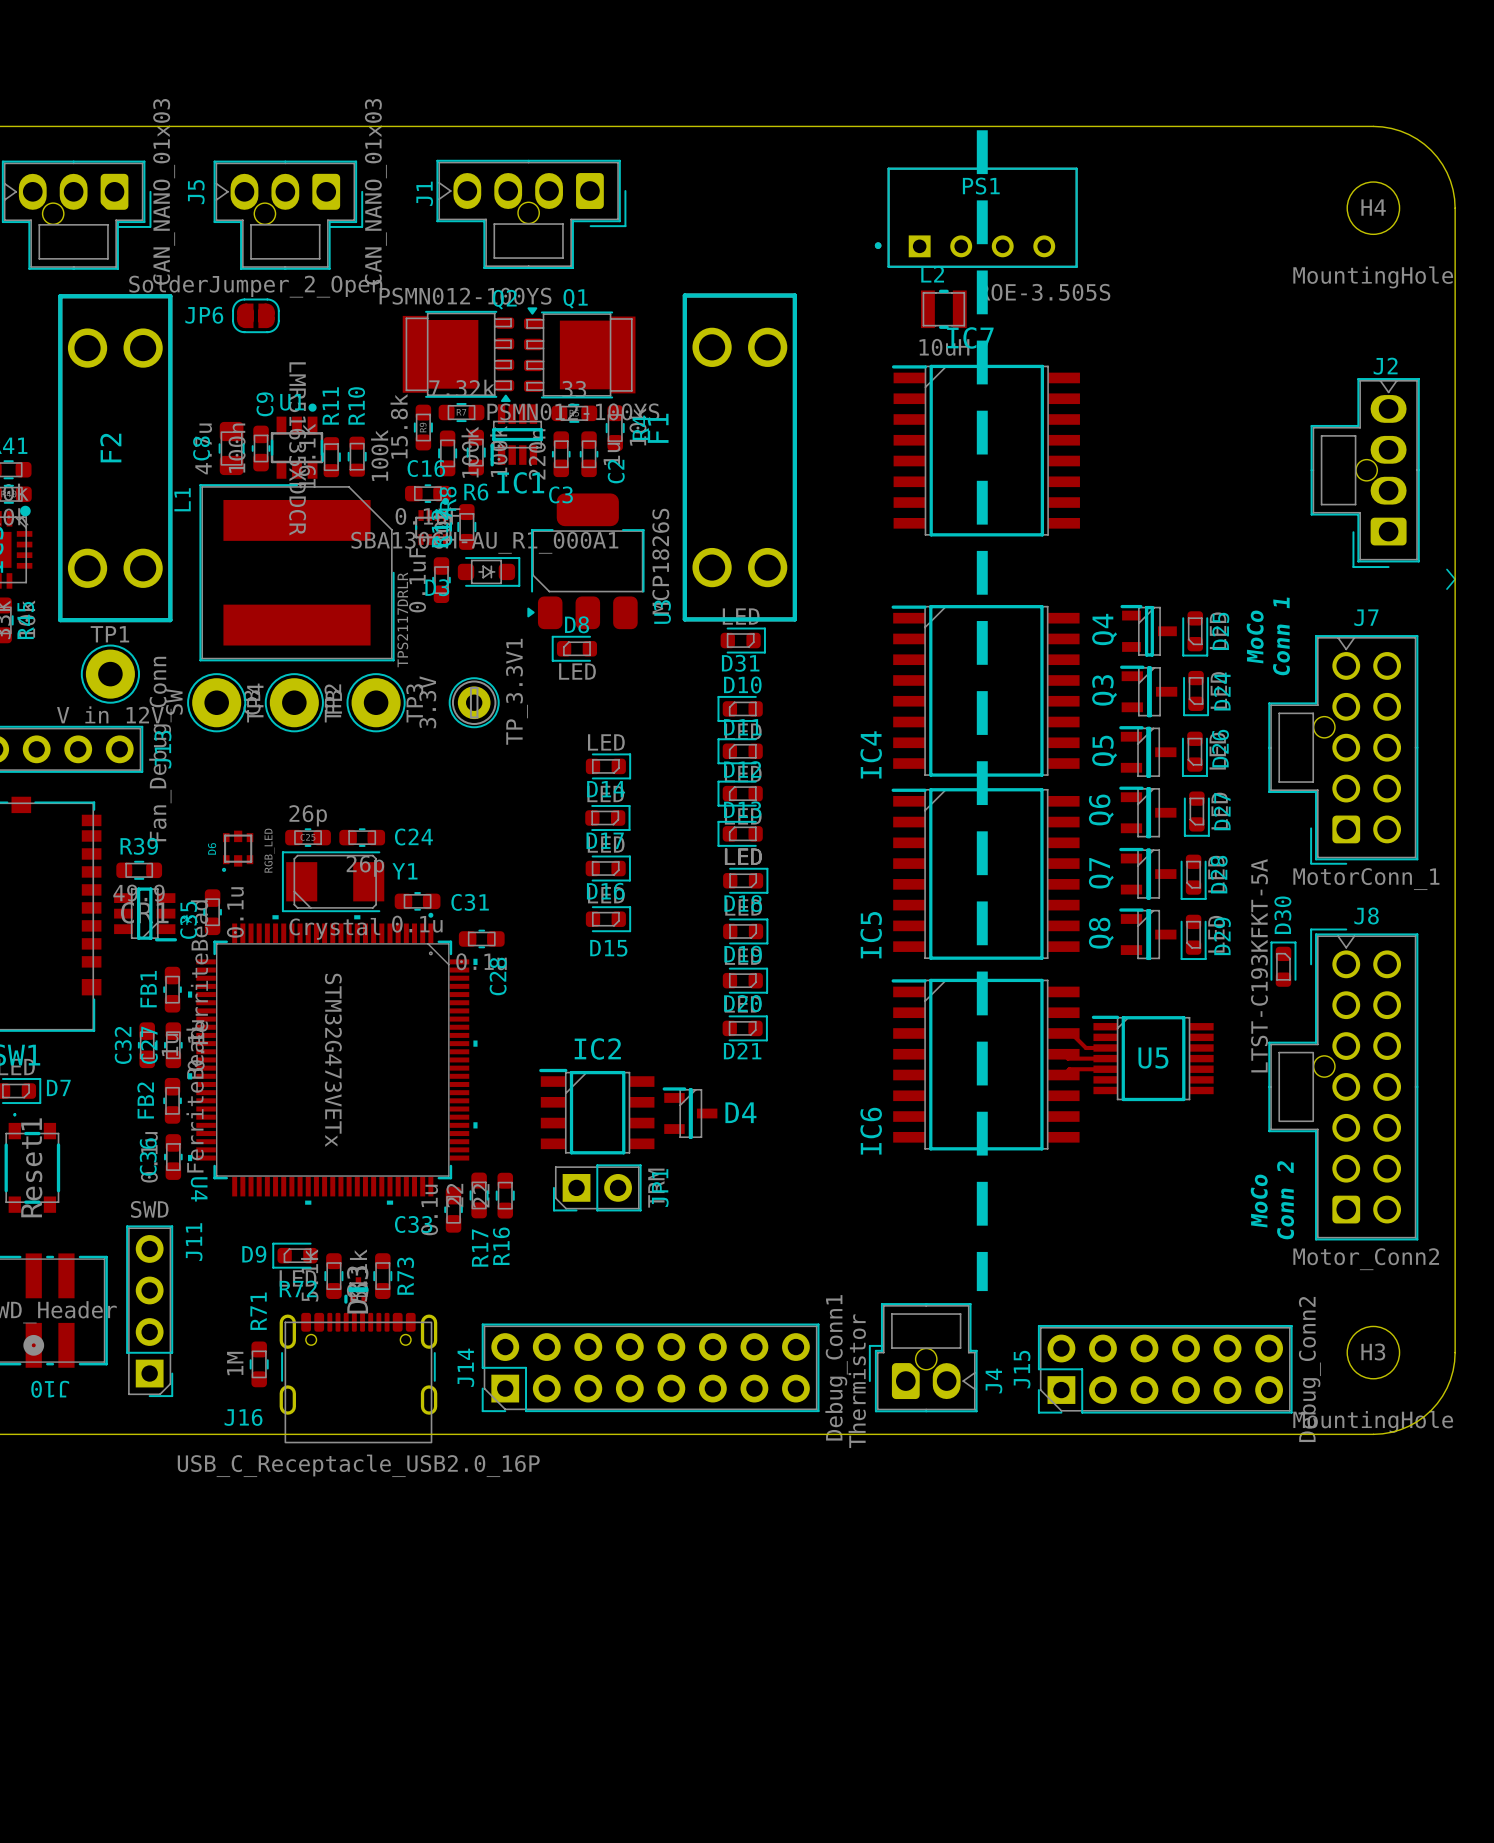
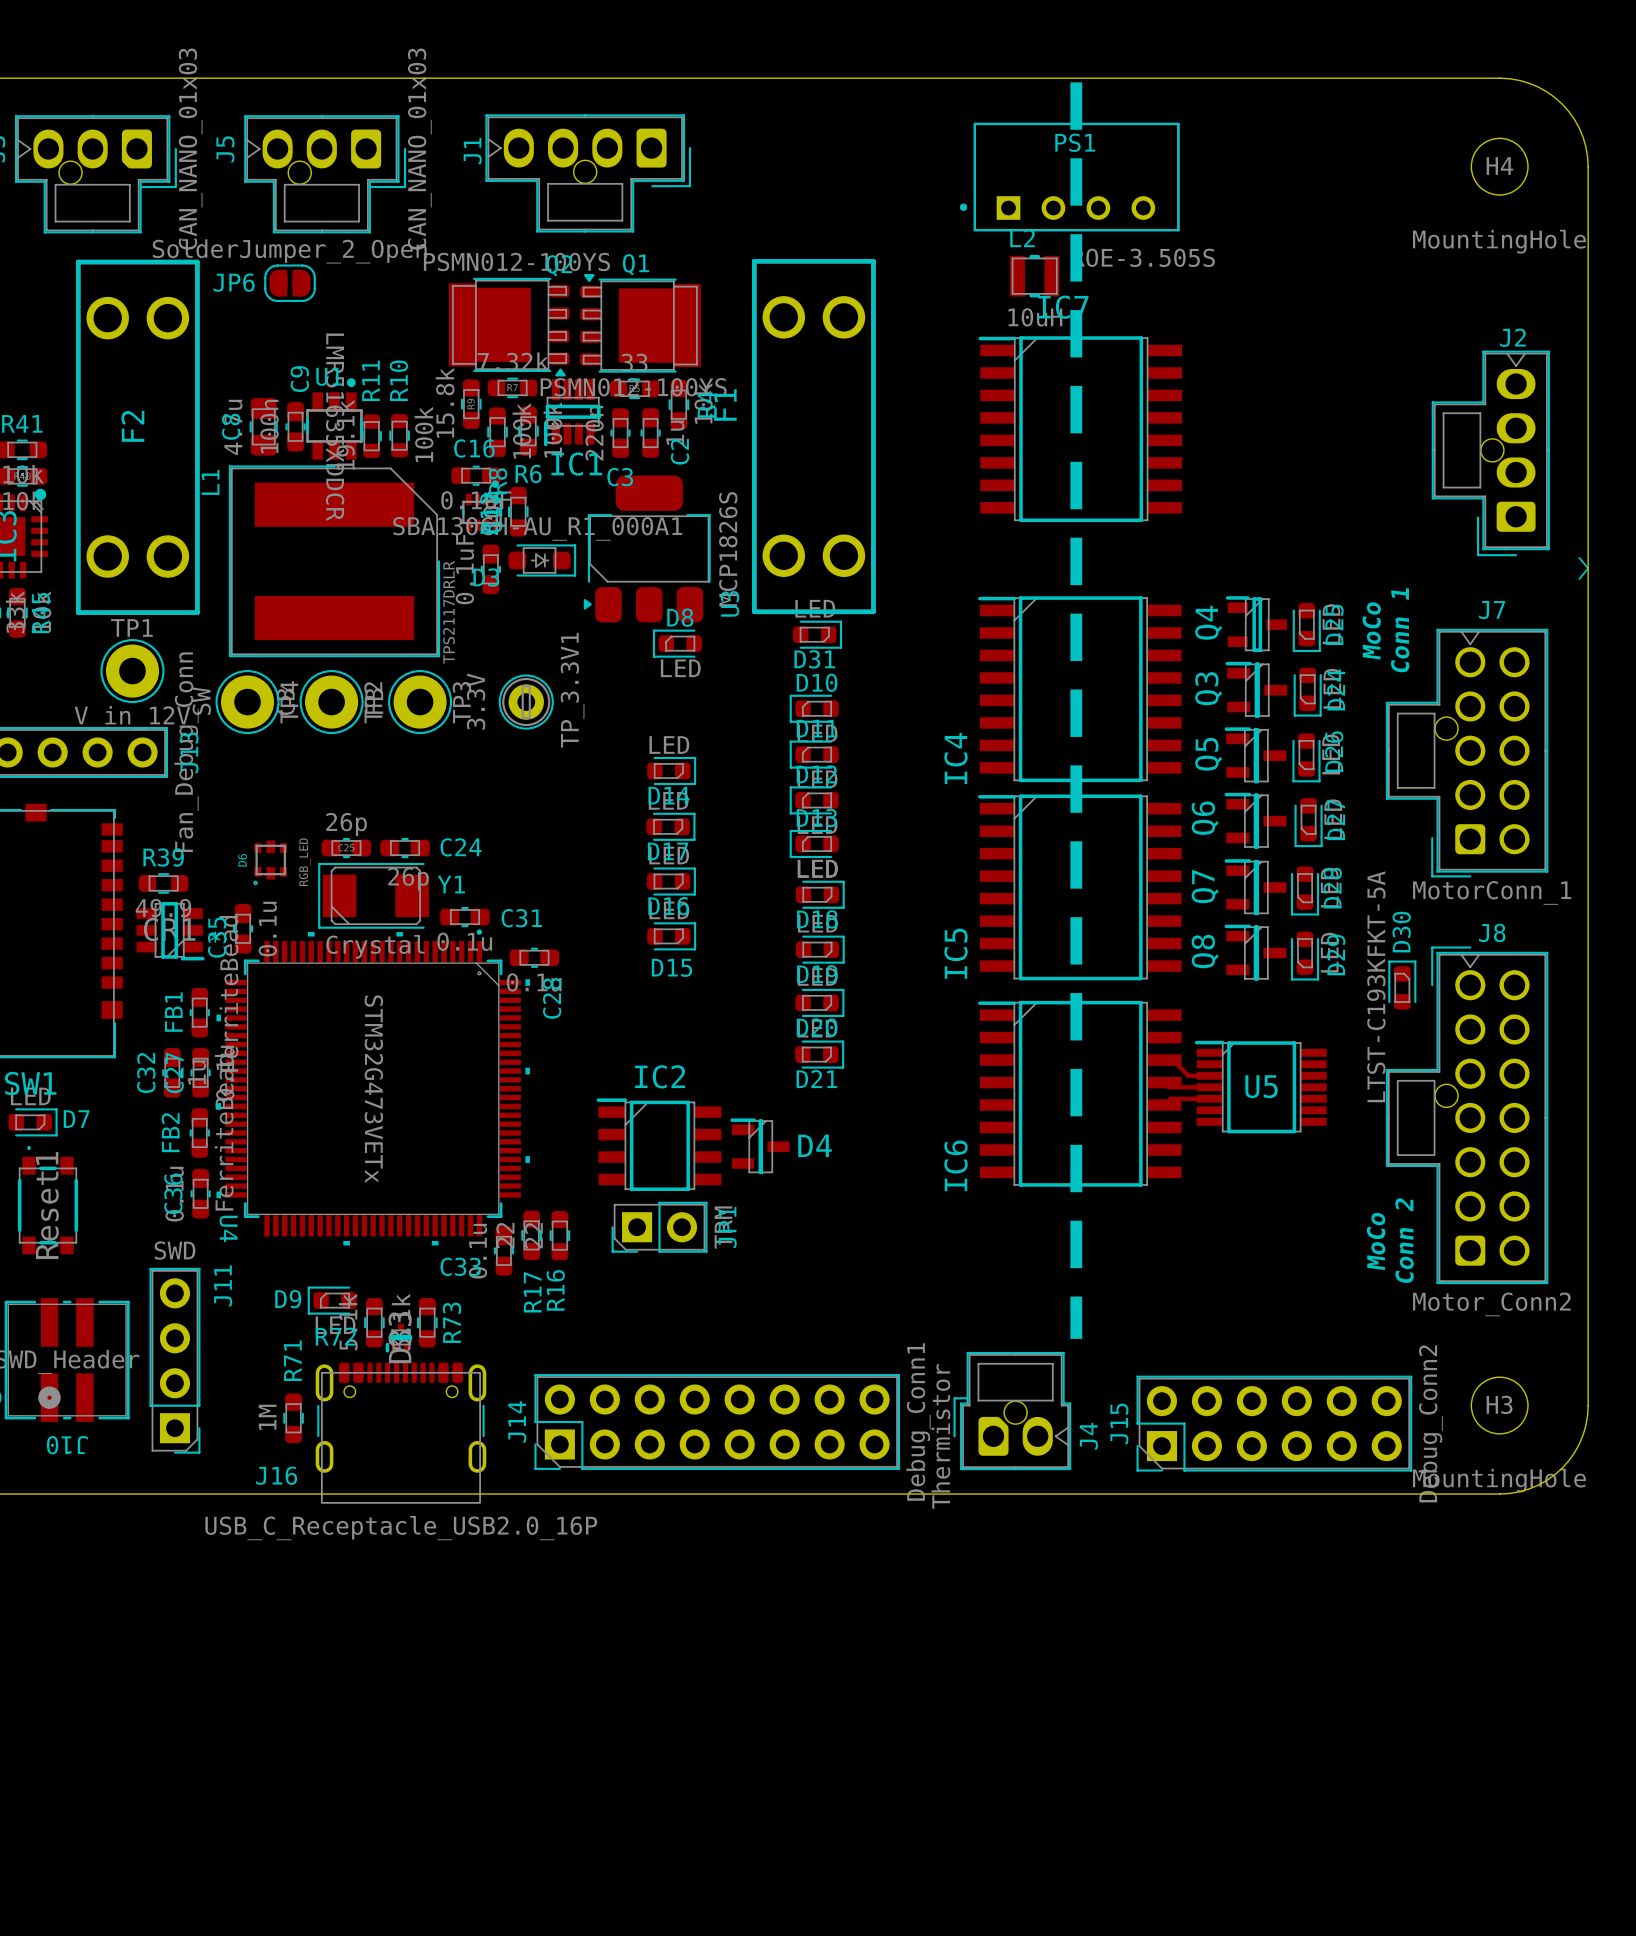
D8 position: (574, 648) -> (677, 643)

